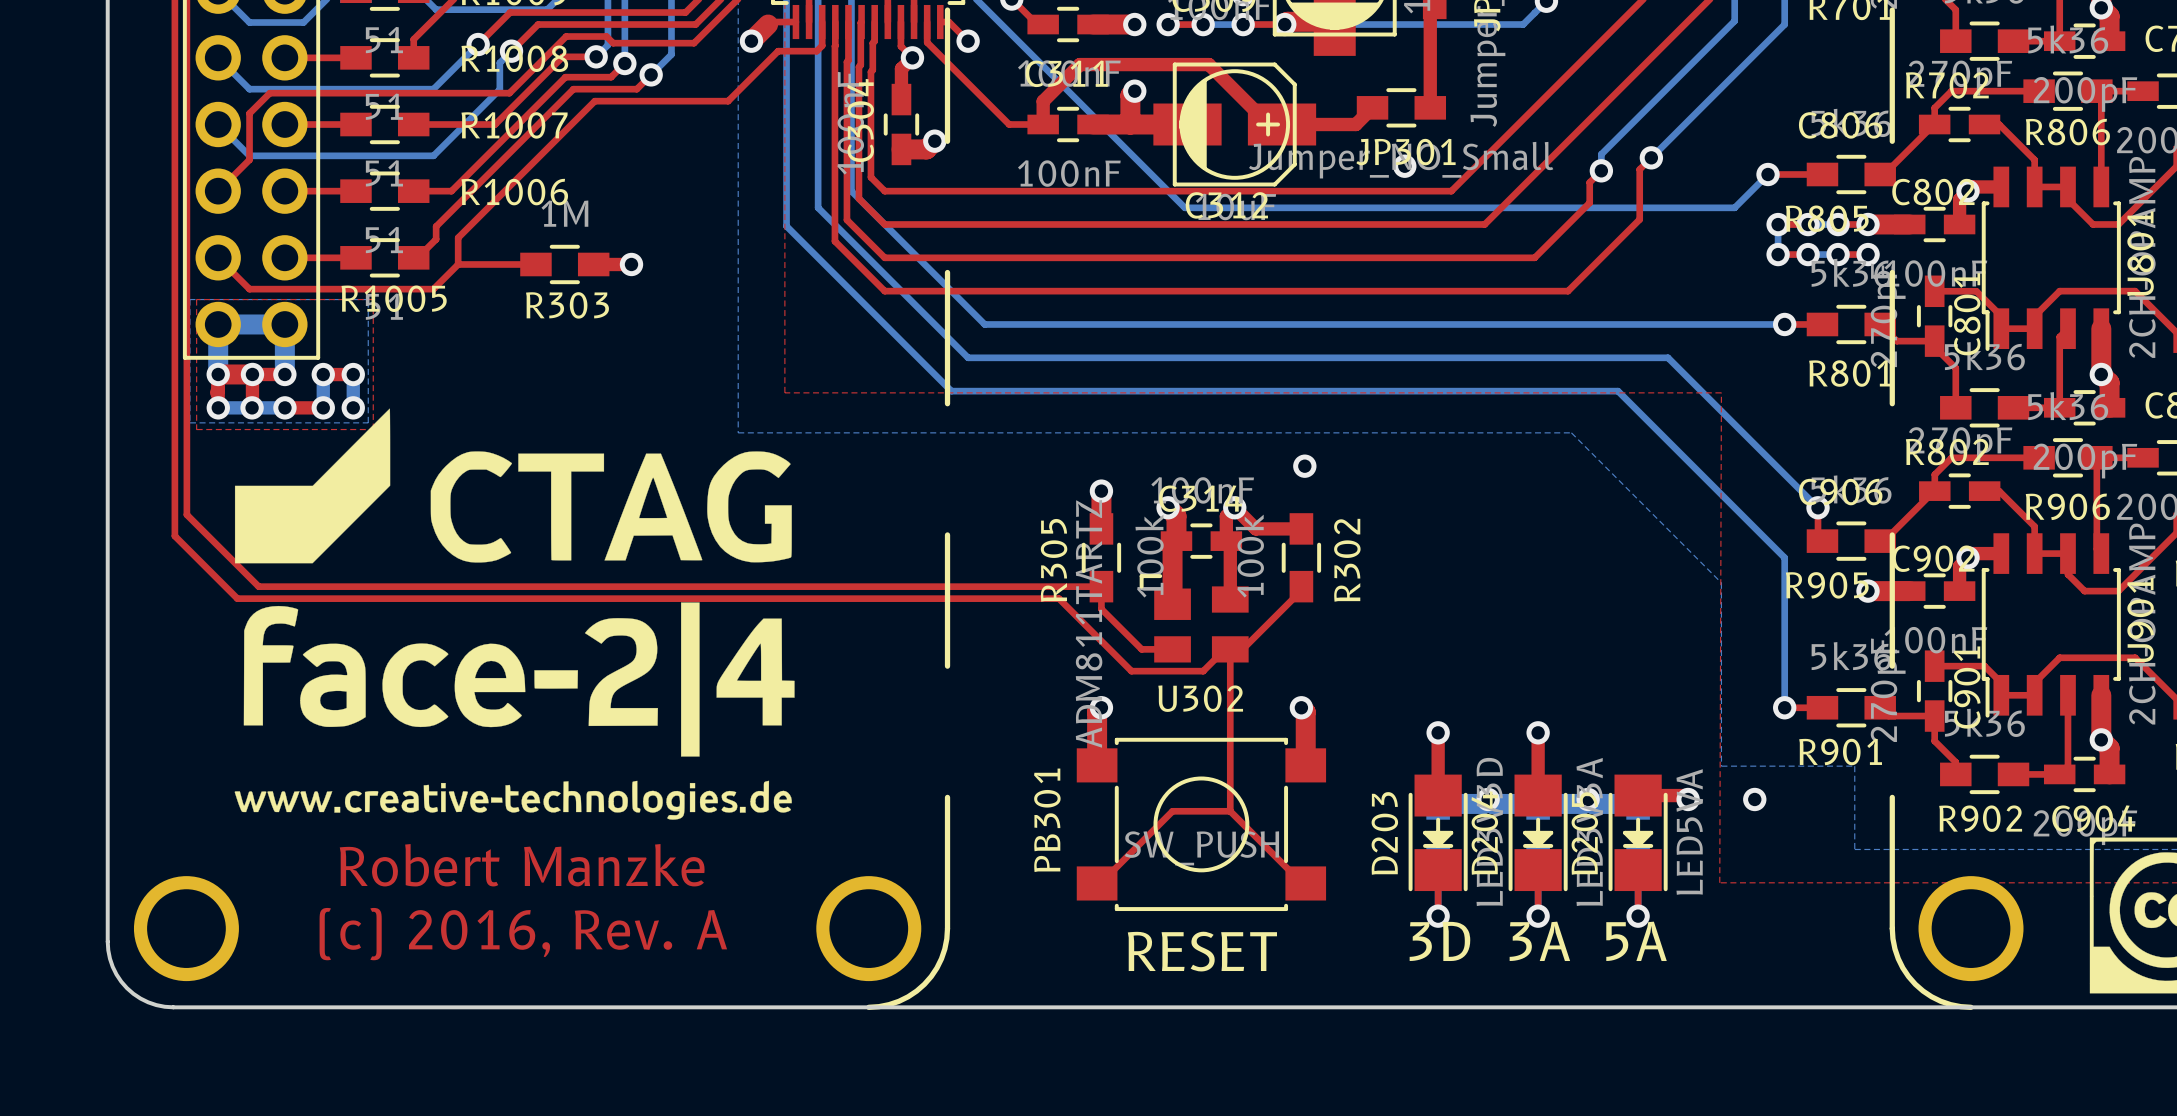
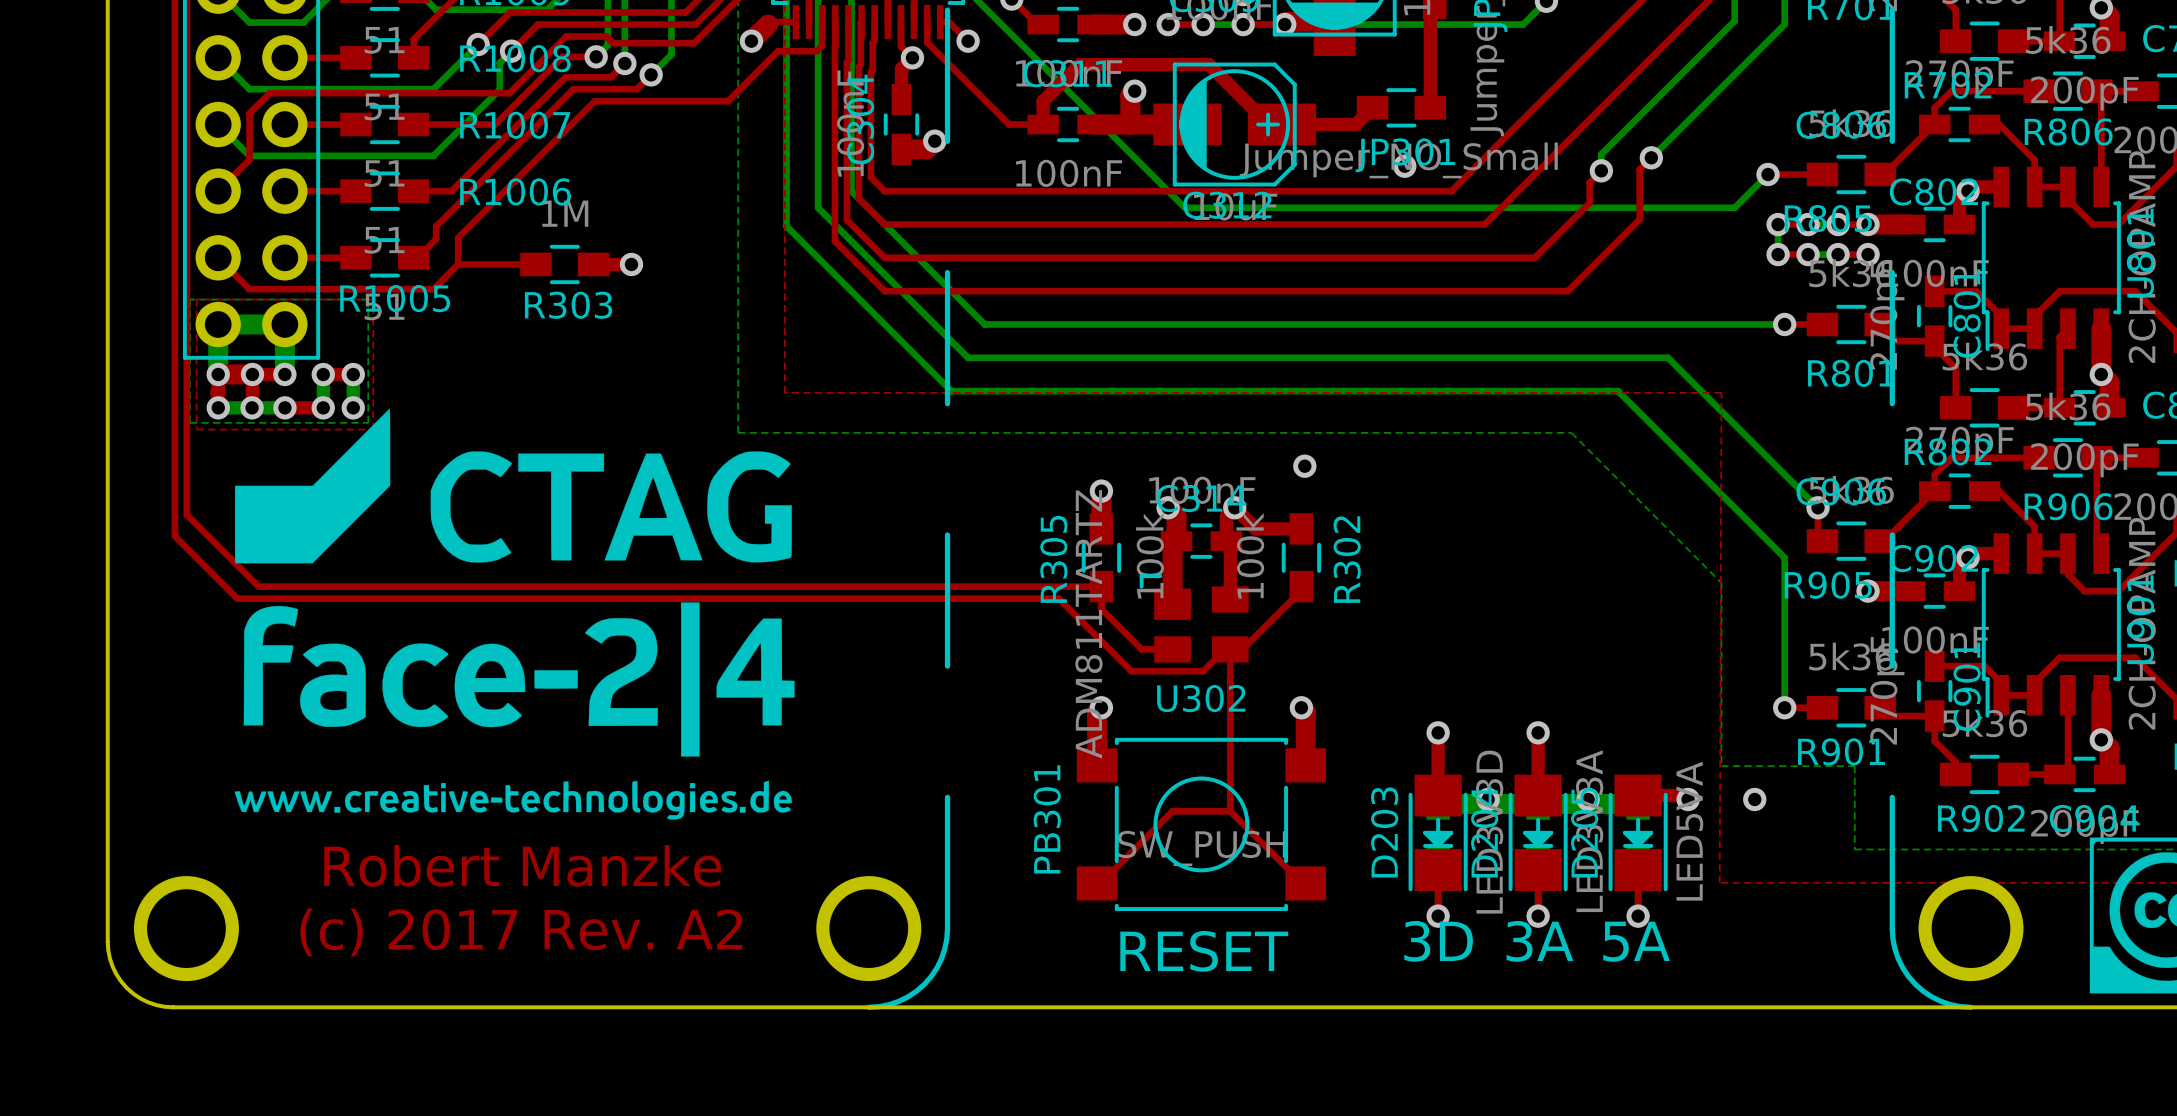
text: (c) 2016, Rev. A (523, 934) -> (c) 2017 Rev. A2 (521, 932)

